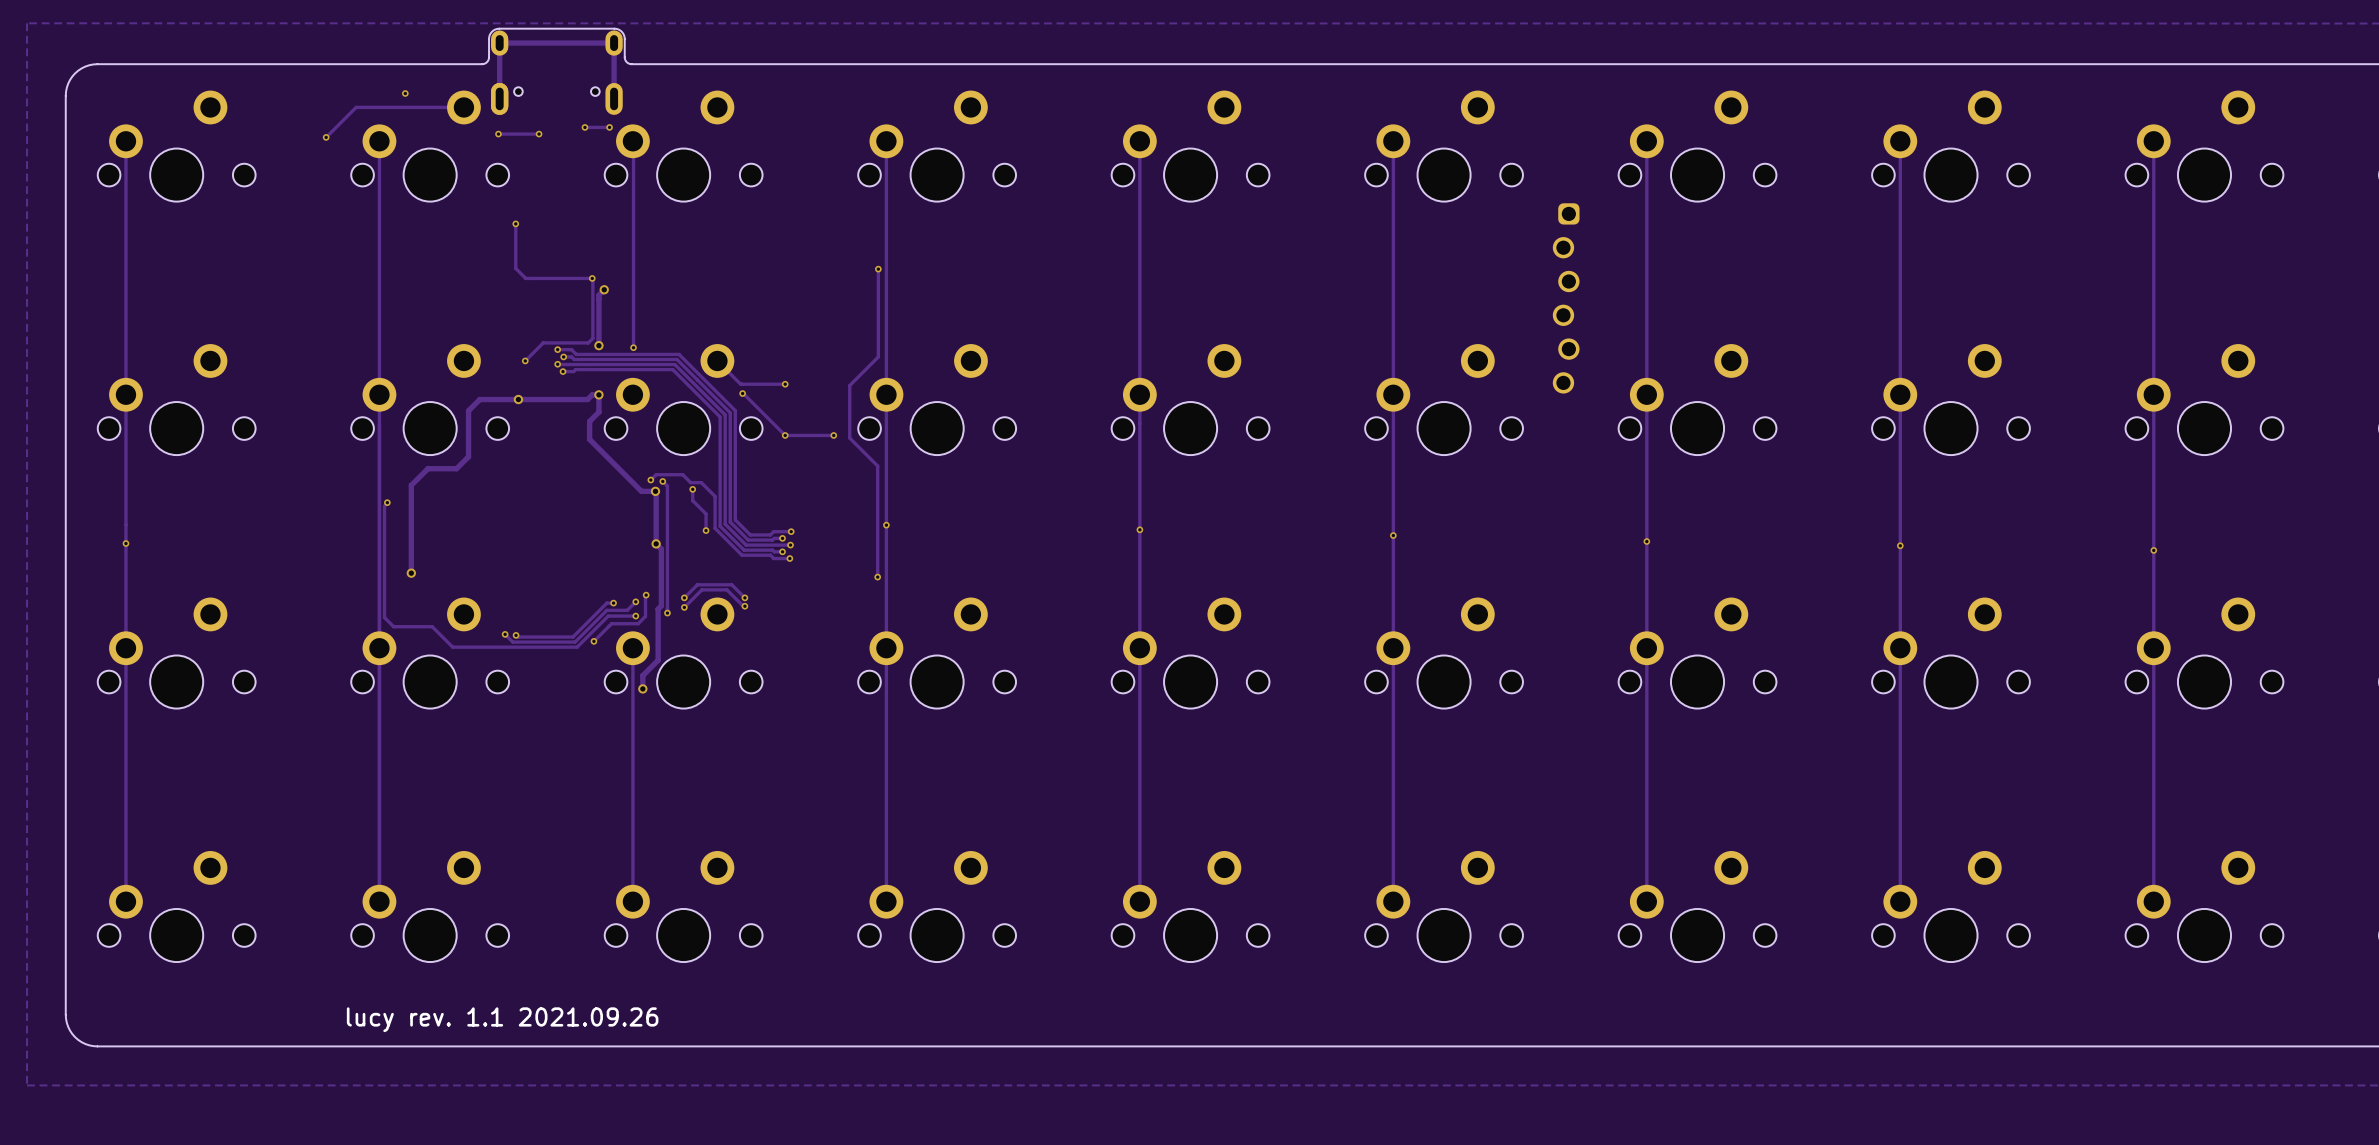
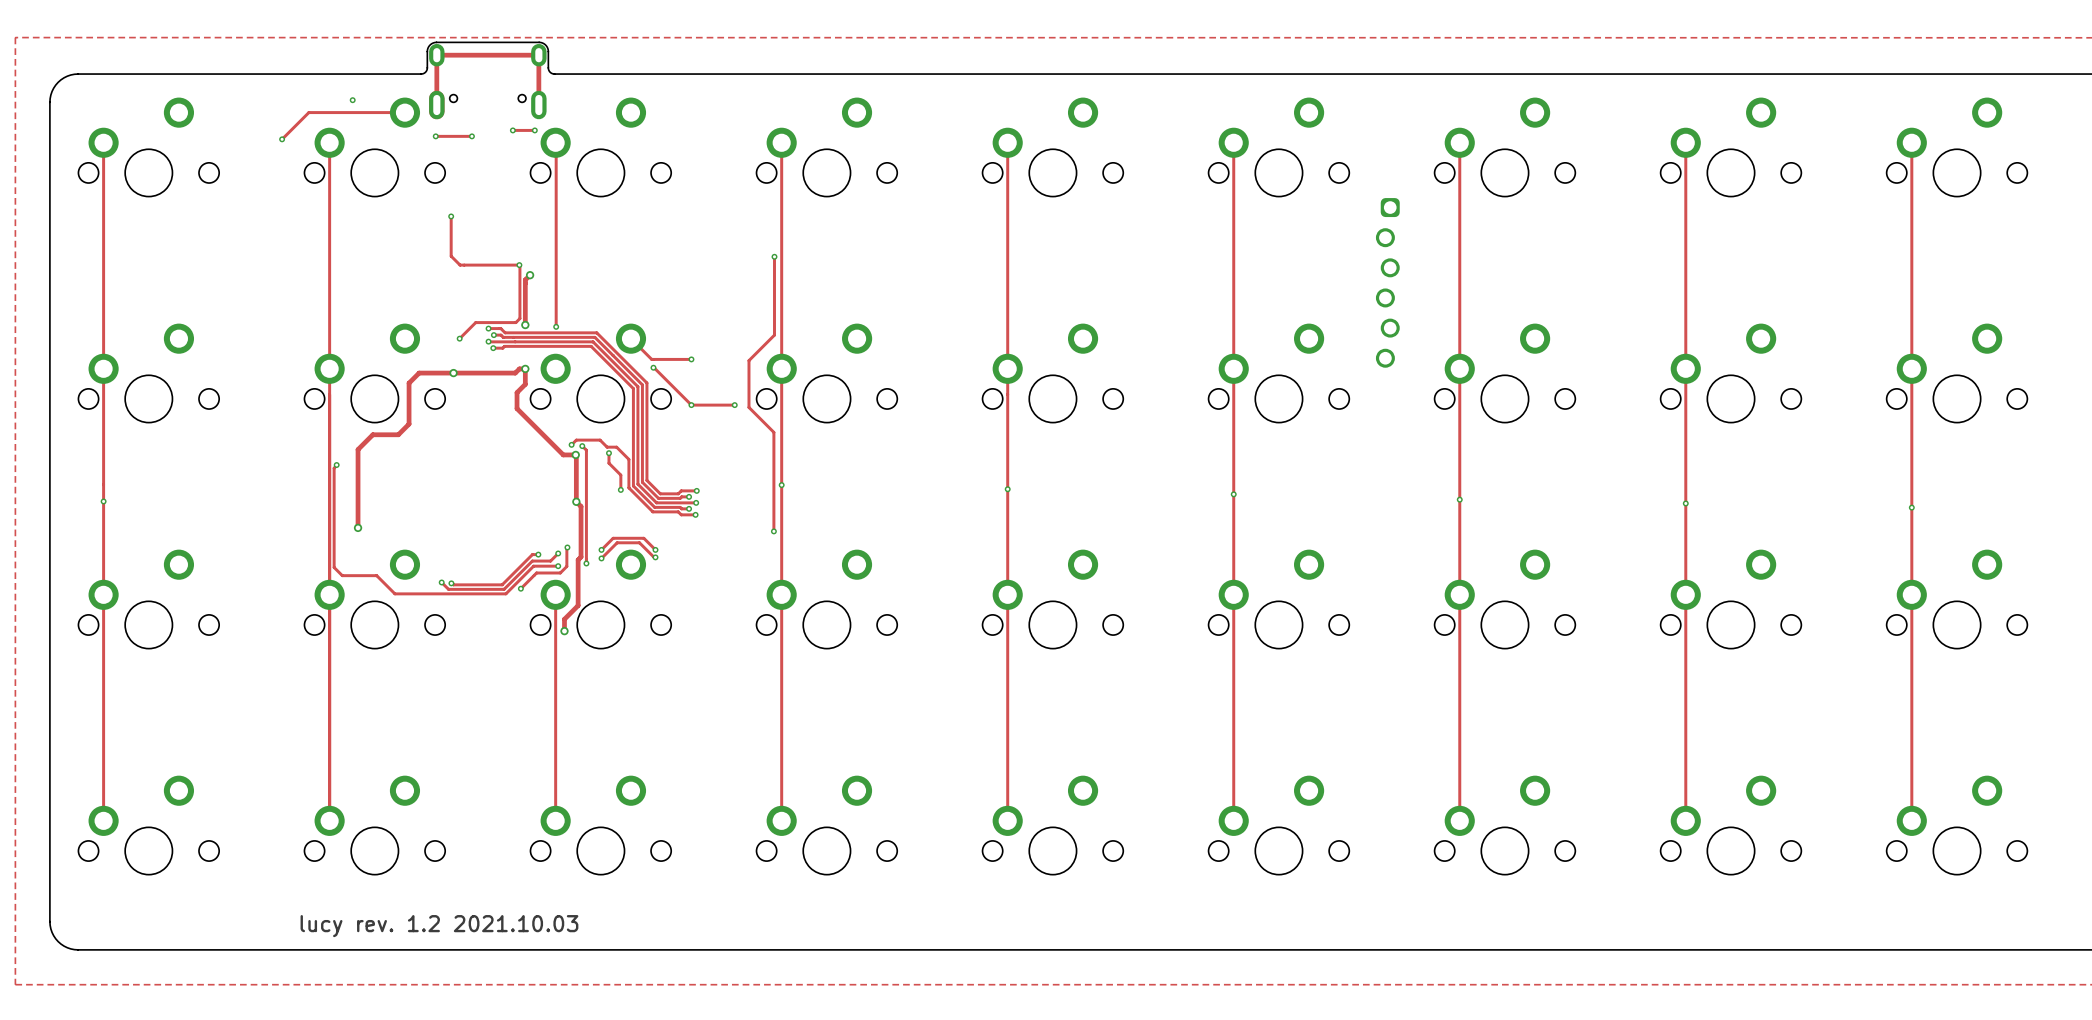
text: lucy rev. 1.1 2021.09.26 (502, 1019) -> lucy rev. 1.2 2021.10.03 (439, 926)

